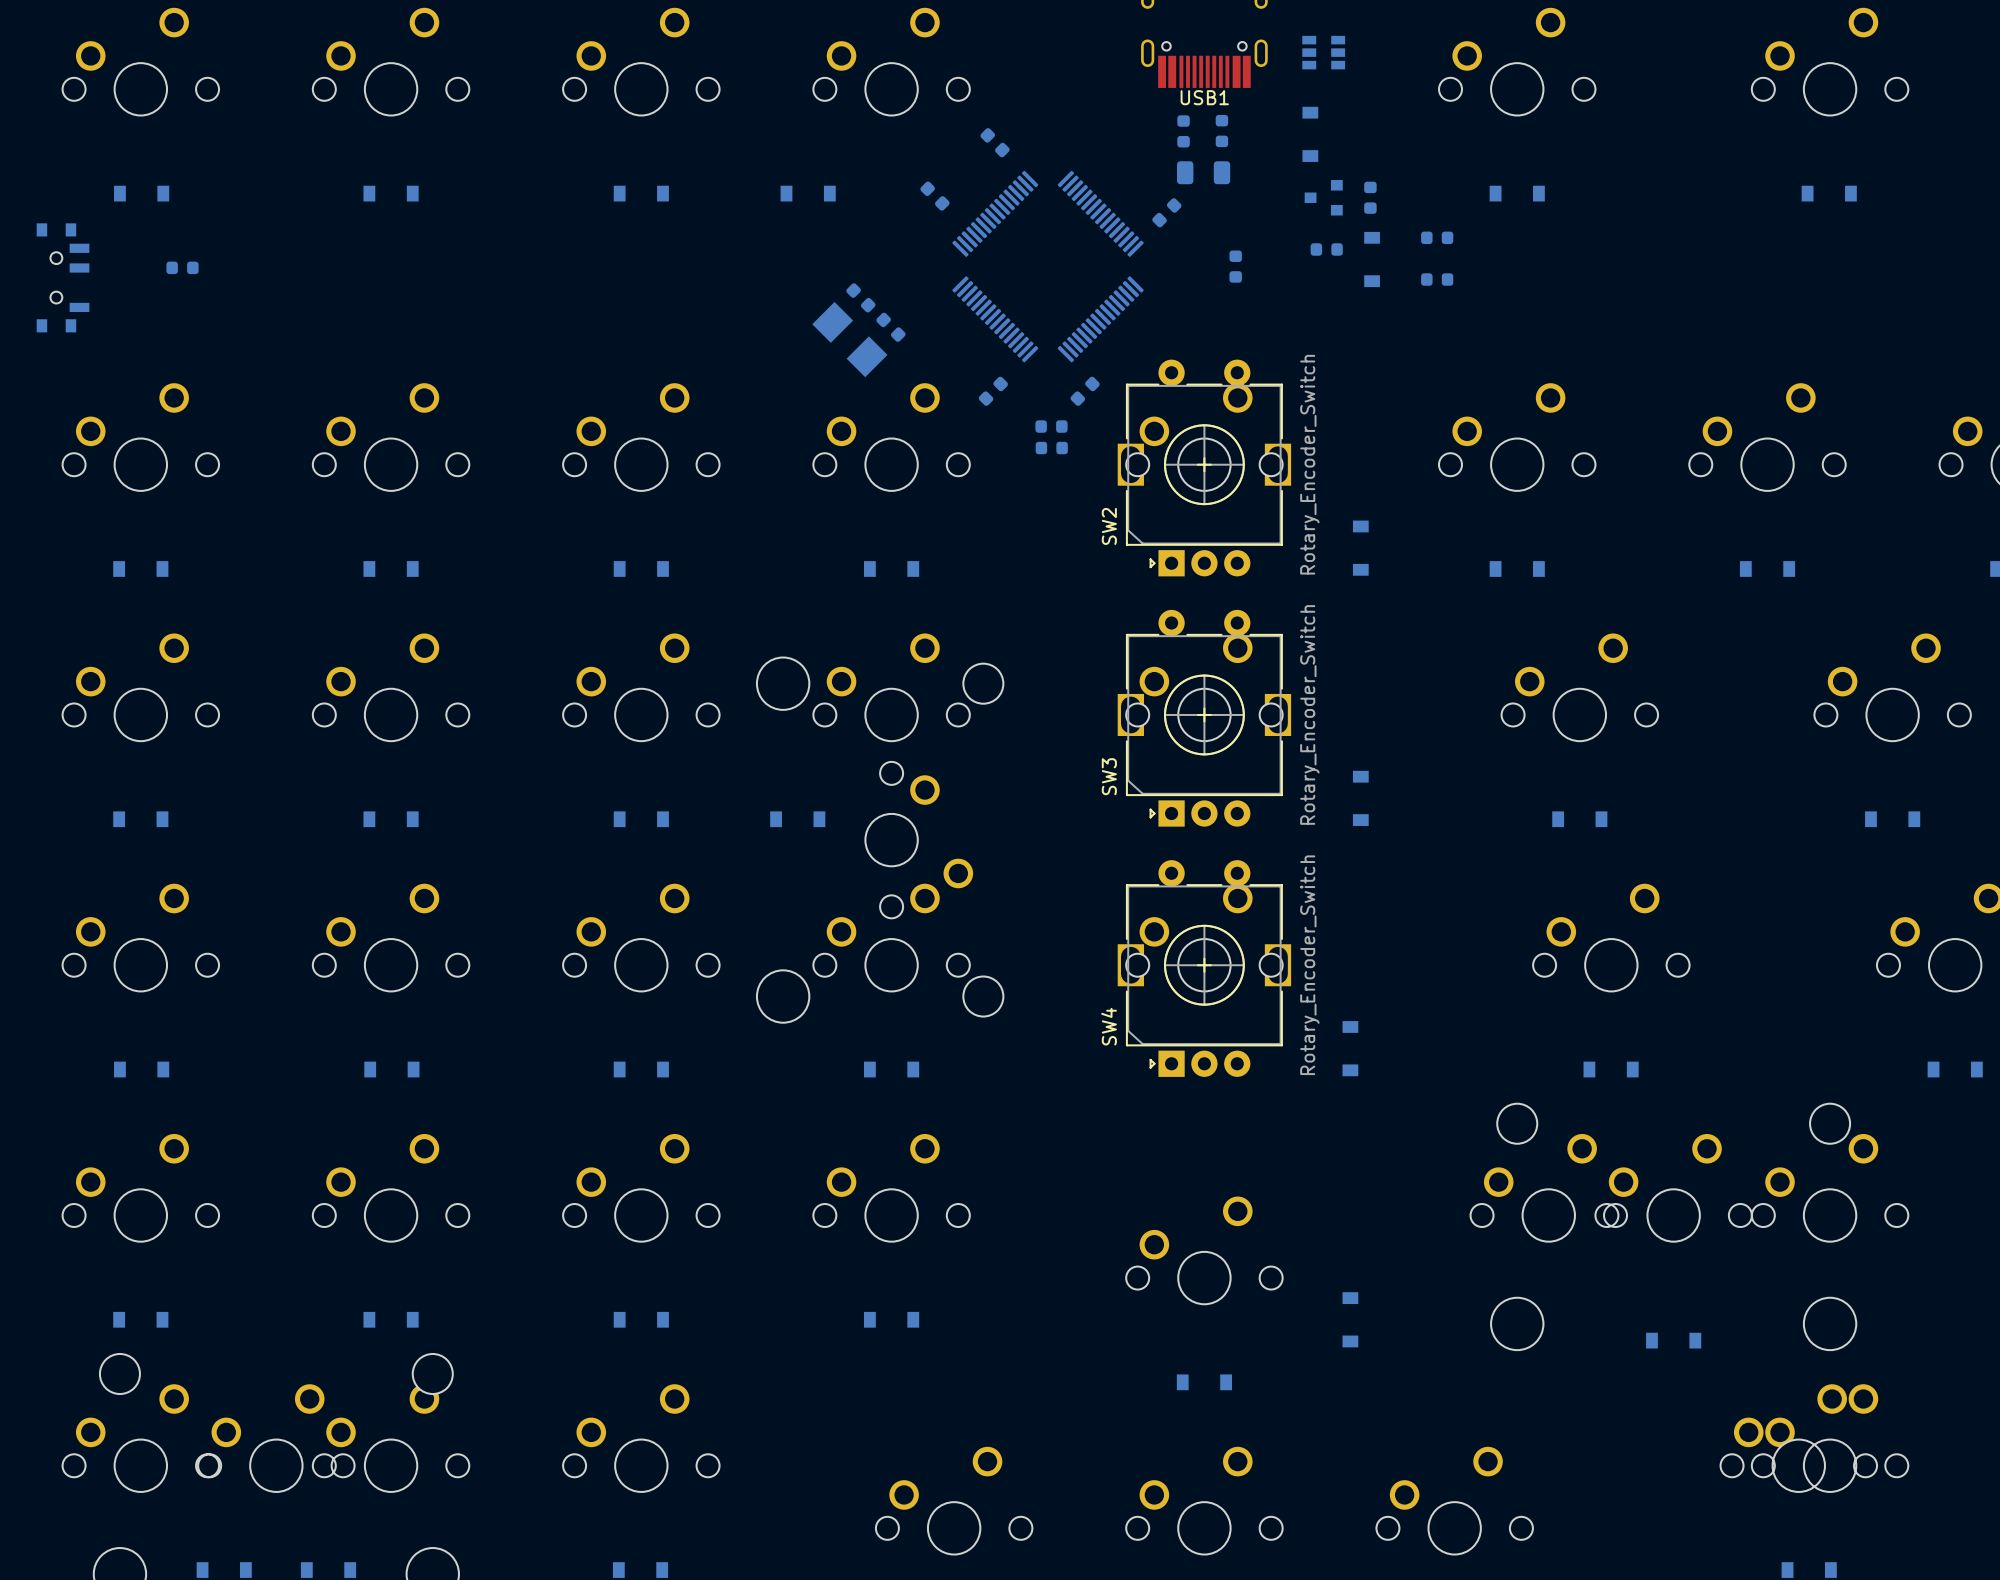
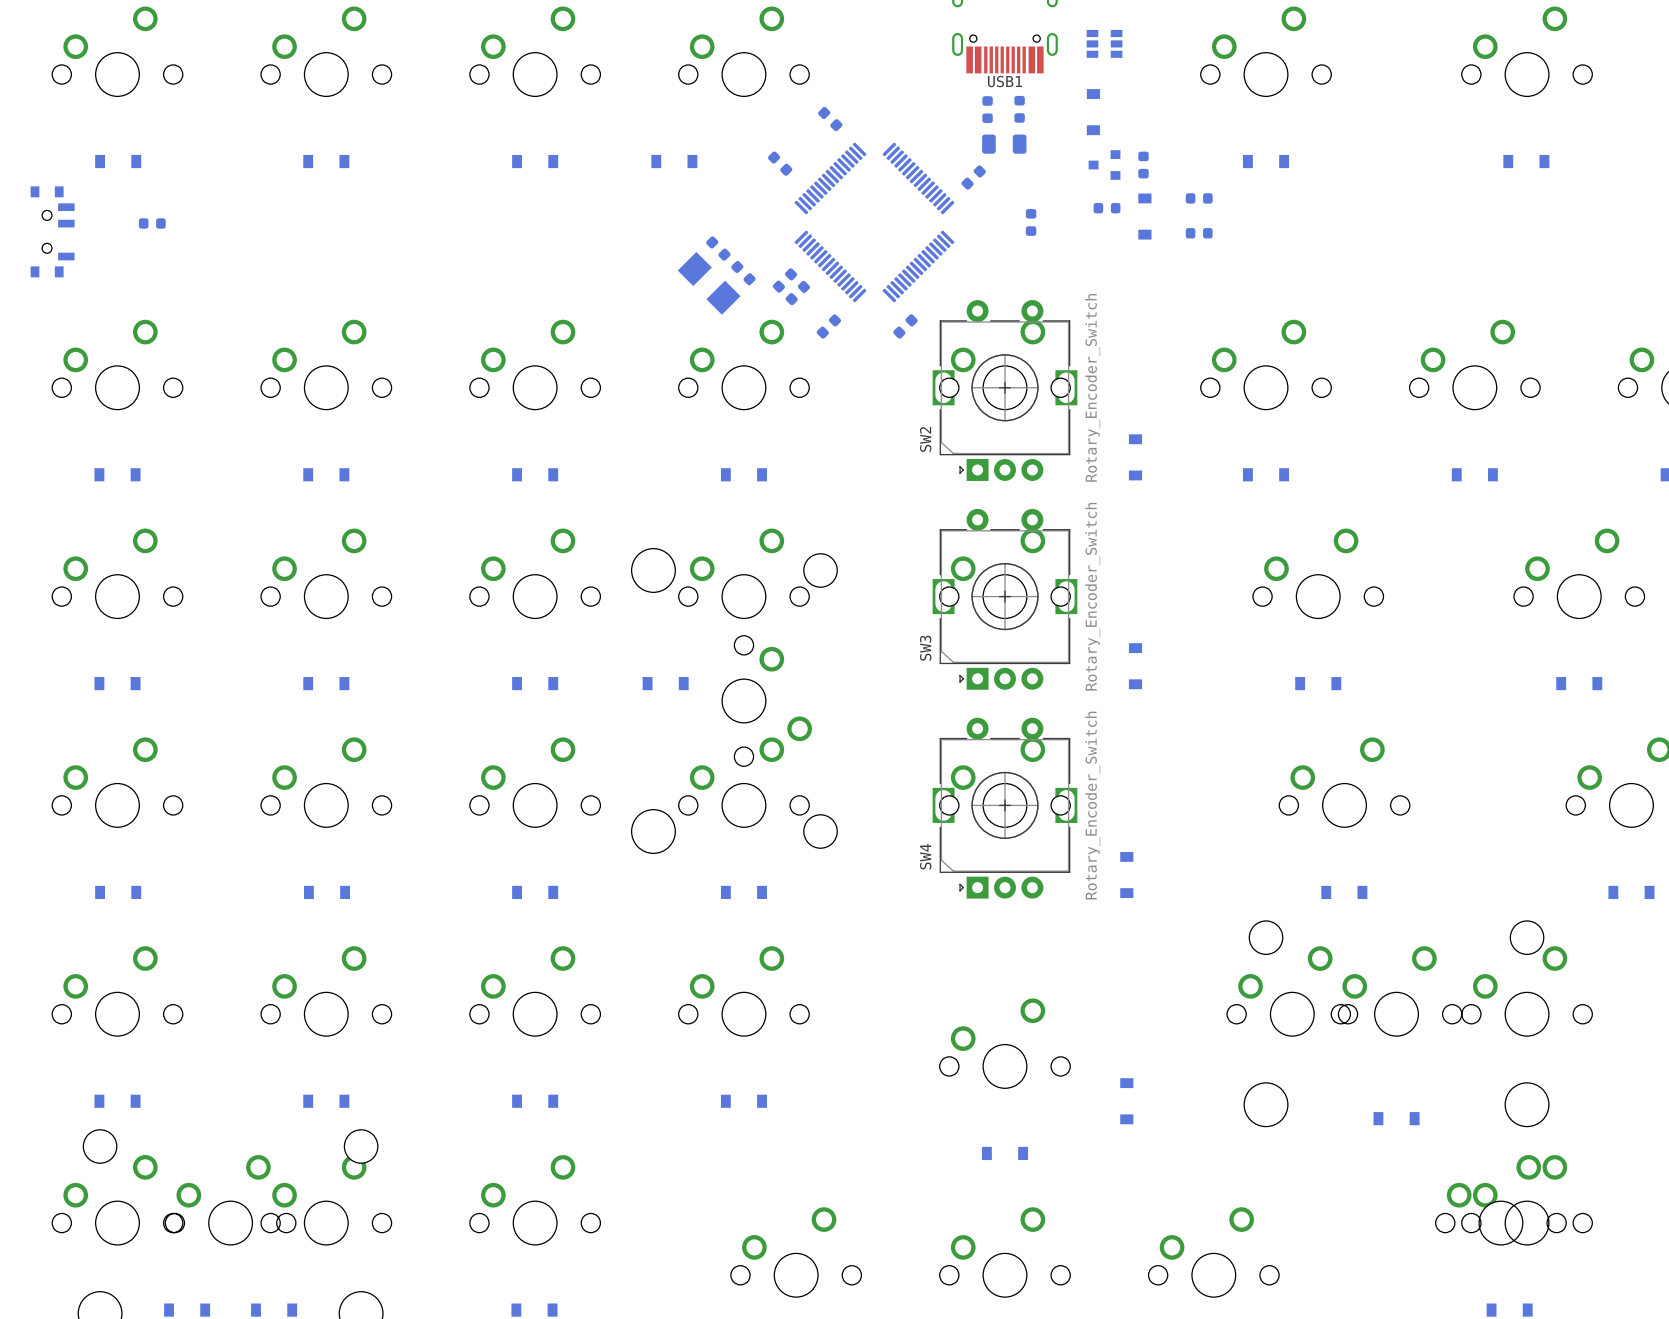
part: none -> (784, 280)
part: none -> (797, 293)
part: (1051, 426) -> none
part: (1051, 448) -> none

